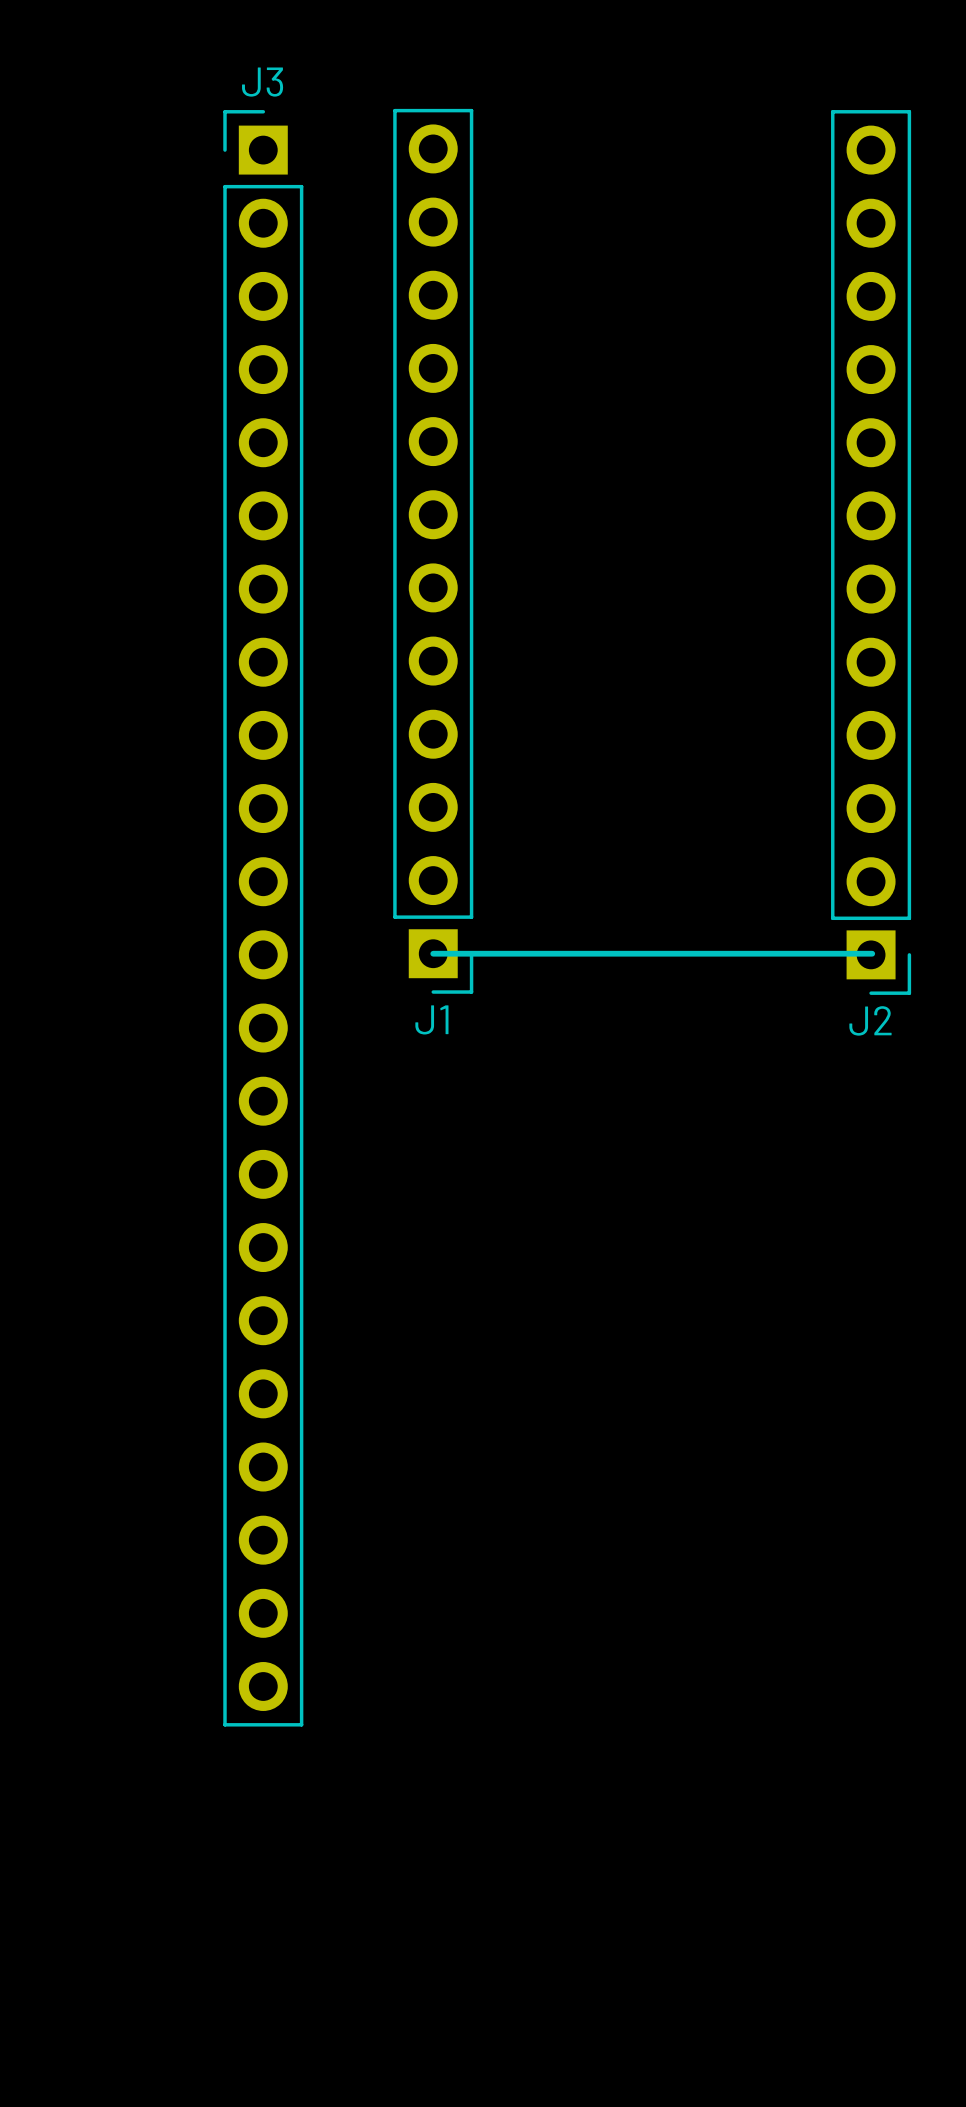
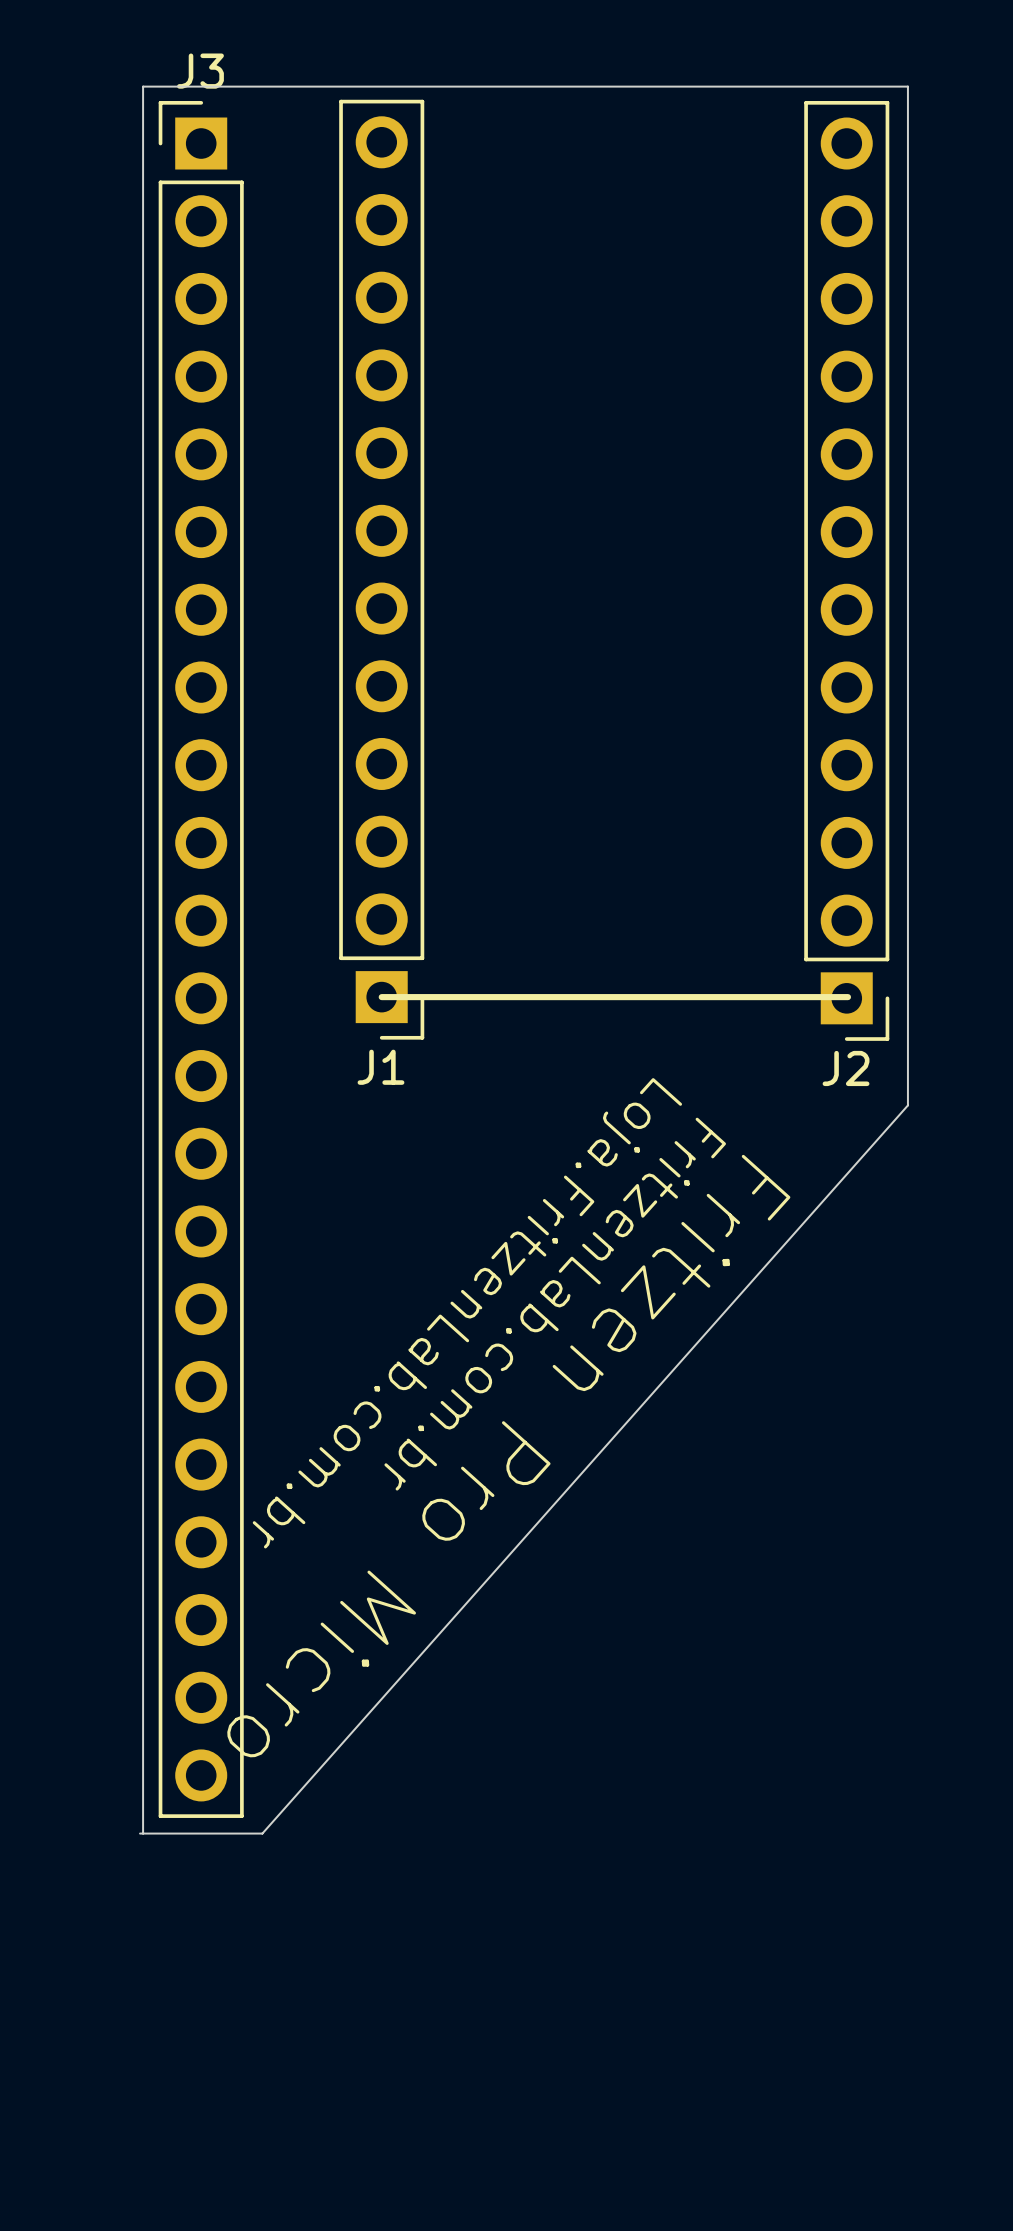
text: none -> FritzenLab.com.br (555, 1304)
text: none -> Loja.FritzenLab.com.br (467, 1313)
text: none -> Fritzen Pro Micro (508, 1456)
board edge: none -> (140, 1833) (262, 1833) (907, 1105) (907, 86) (143, 86) (143, 1833)

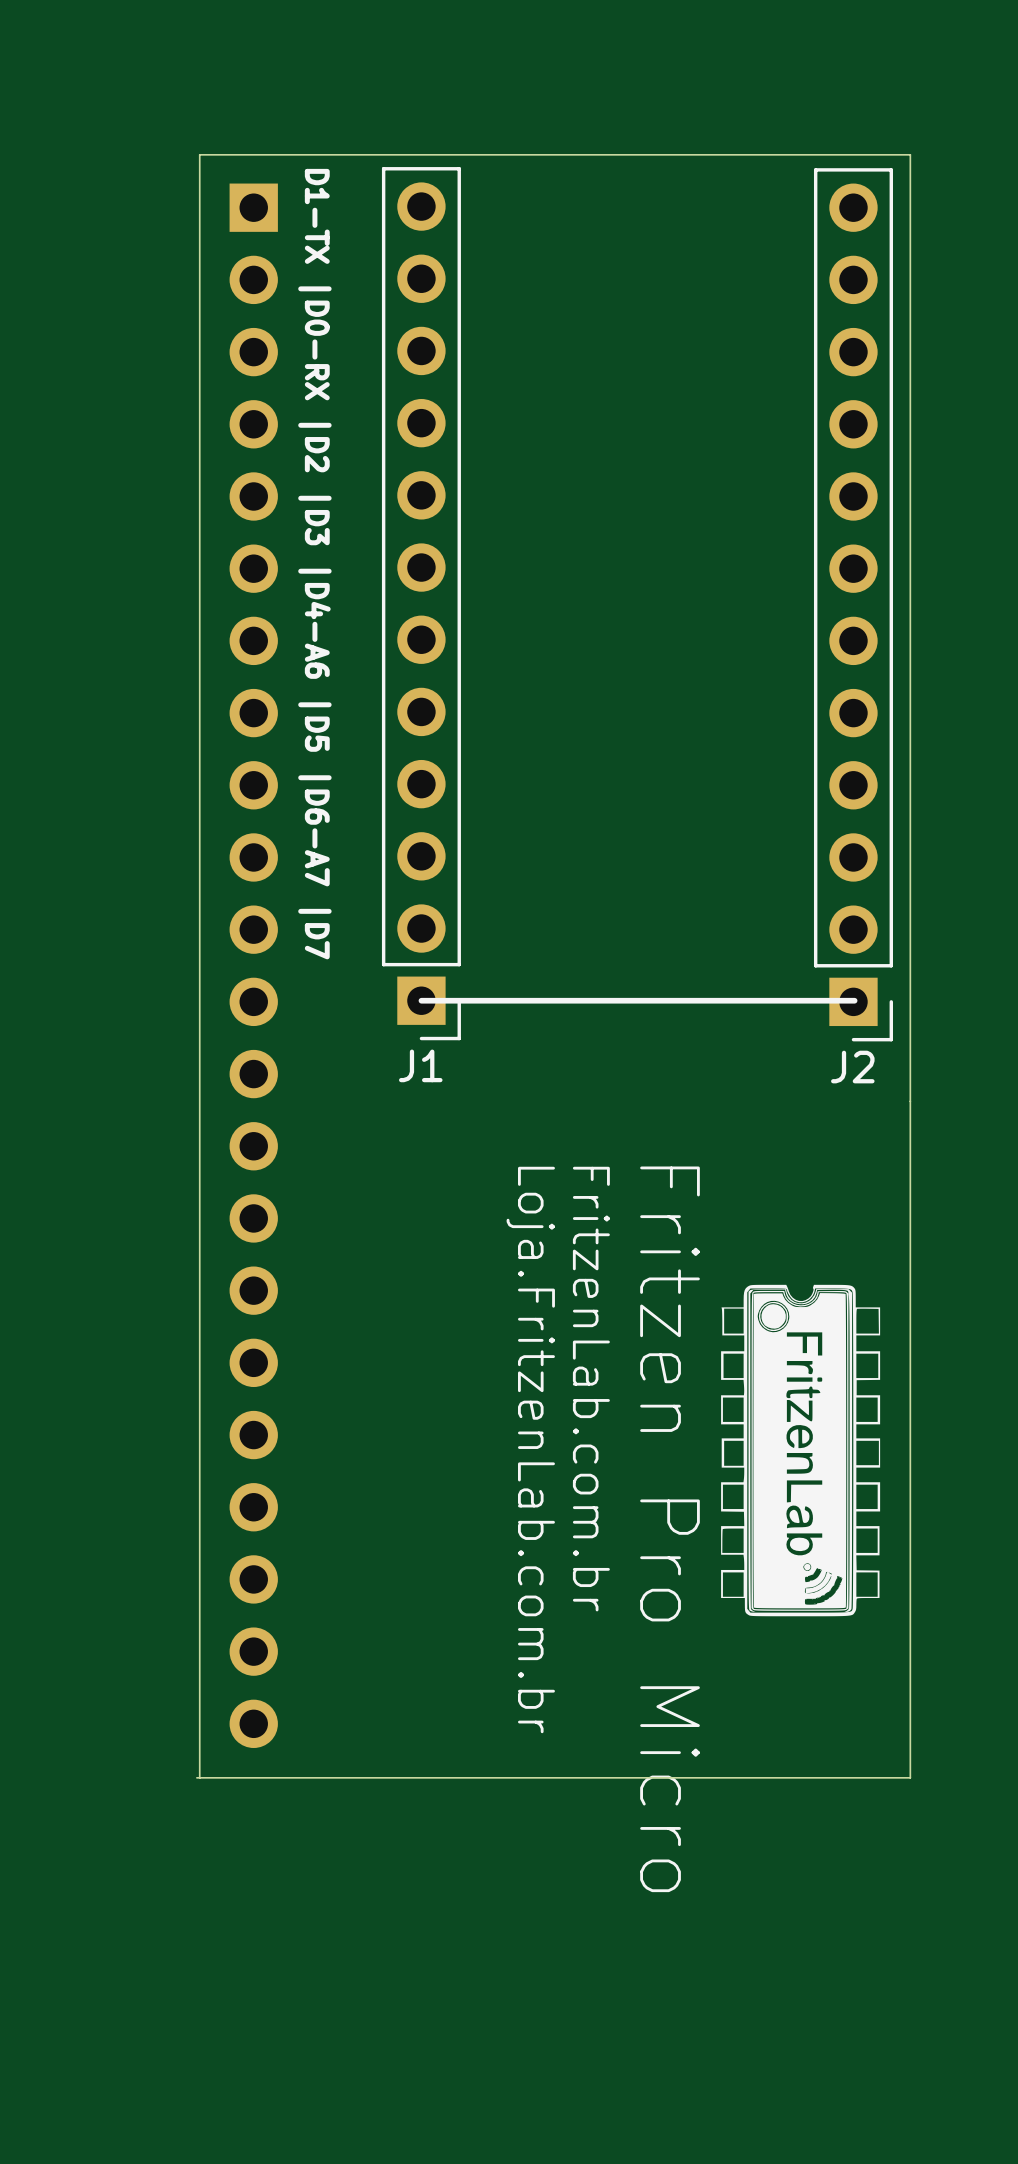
text: none -> D1-TX |D0-RX |D2 |D3 |D4-A6 |D5 |D6-A7 |D7 (314, 564)
J3 side: top (201, 959) -> bottom (253, 965)
board edge: (907, 1105) (262, 1833) -> (910, 1101) (910, 1777) (310, 1777)
drawing: none -> [721, 1284, 881, 1617]
text rotation: 0° (555, 1304) -> 42° counterclockwise (591, 1389)
text rotation: 0° (467, 1313) -> 42° counterclockwise (530, 1449)
text rotation: 0° (508, 1456) -> 42° counterclockwise (670, 1529)

